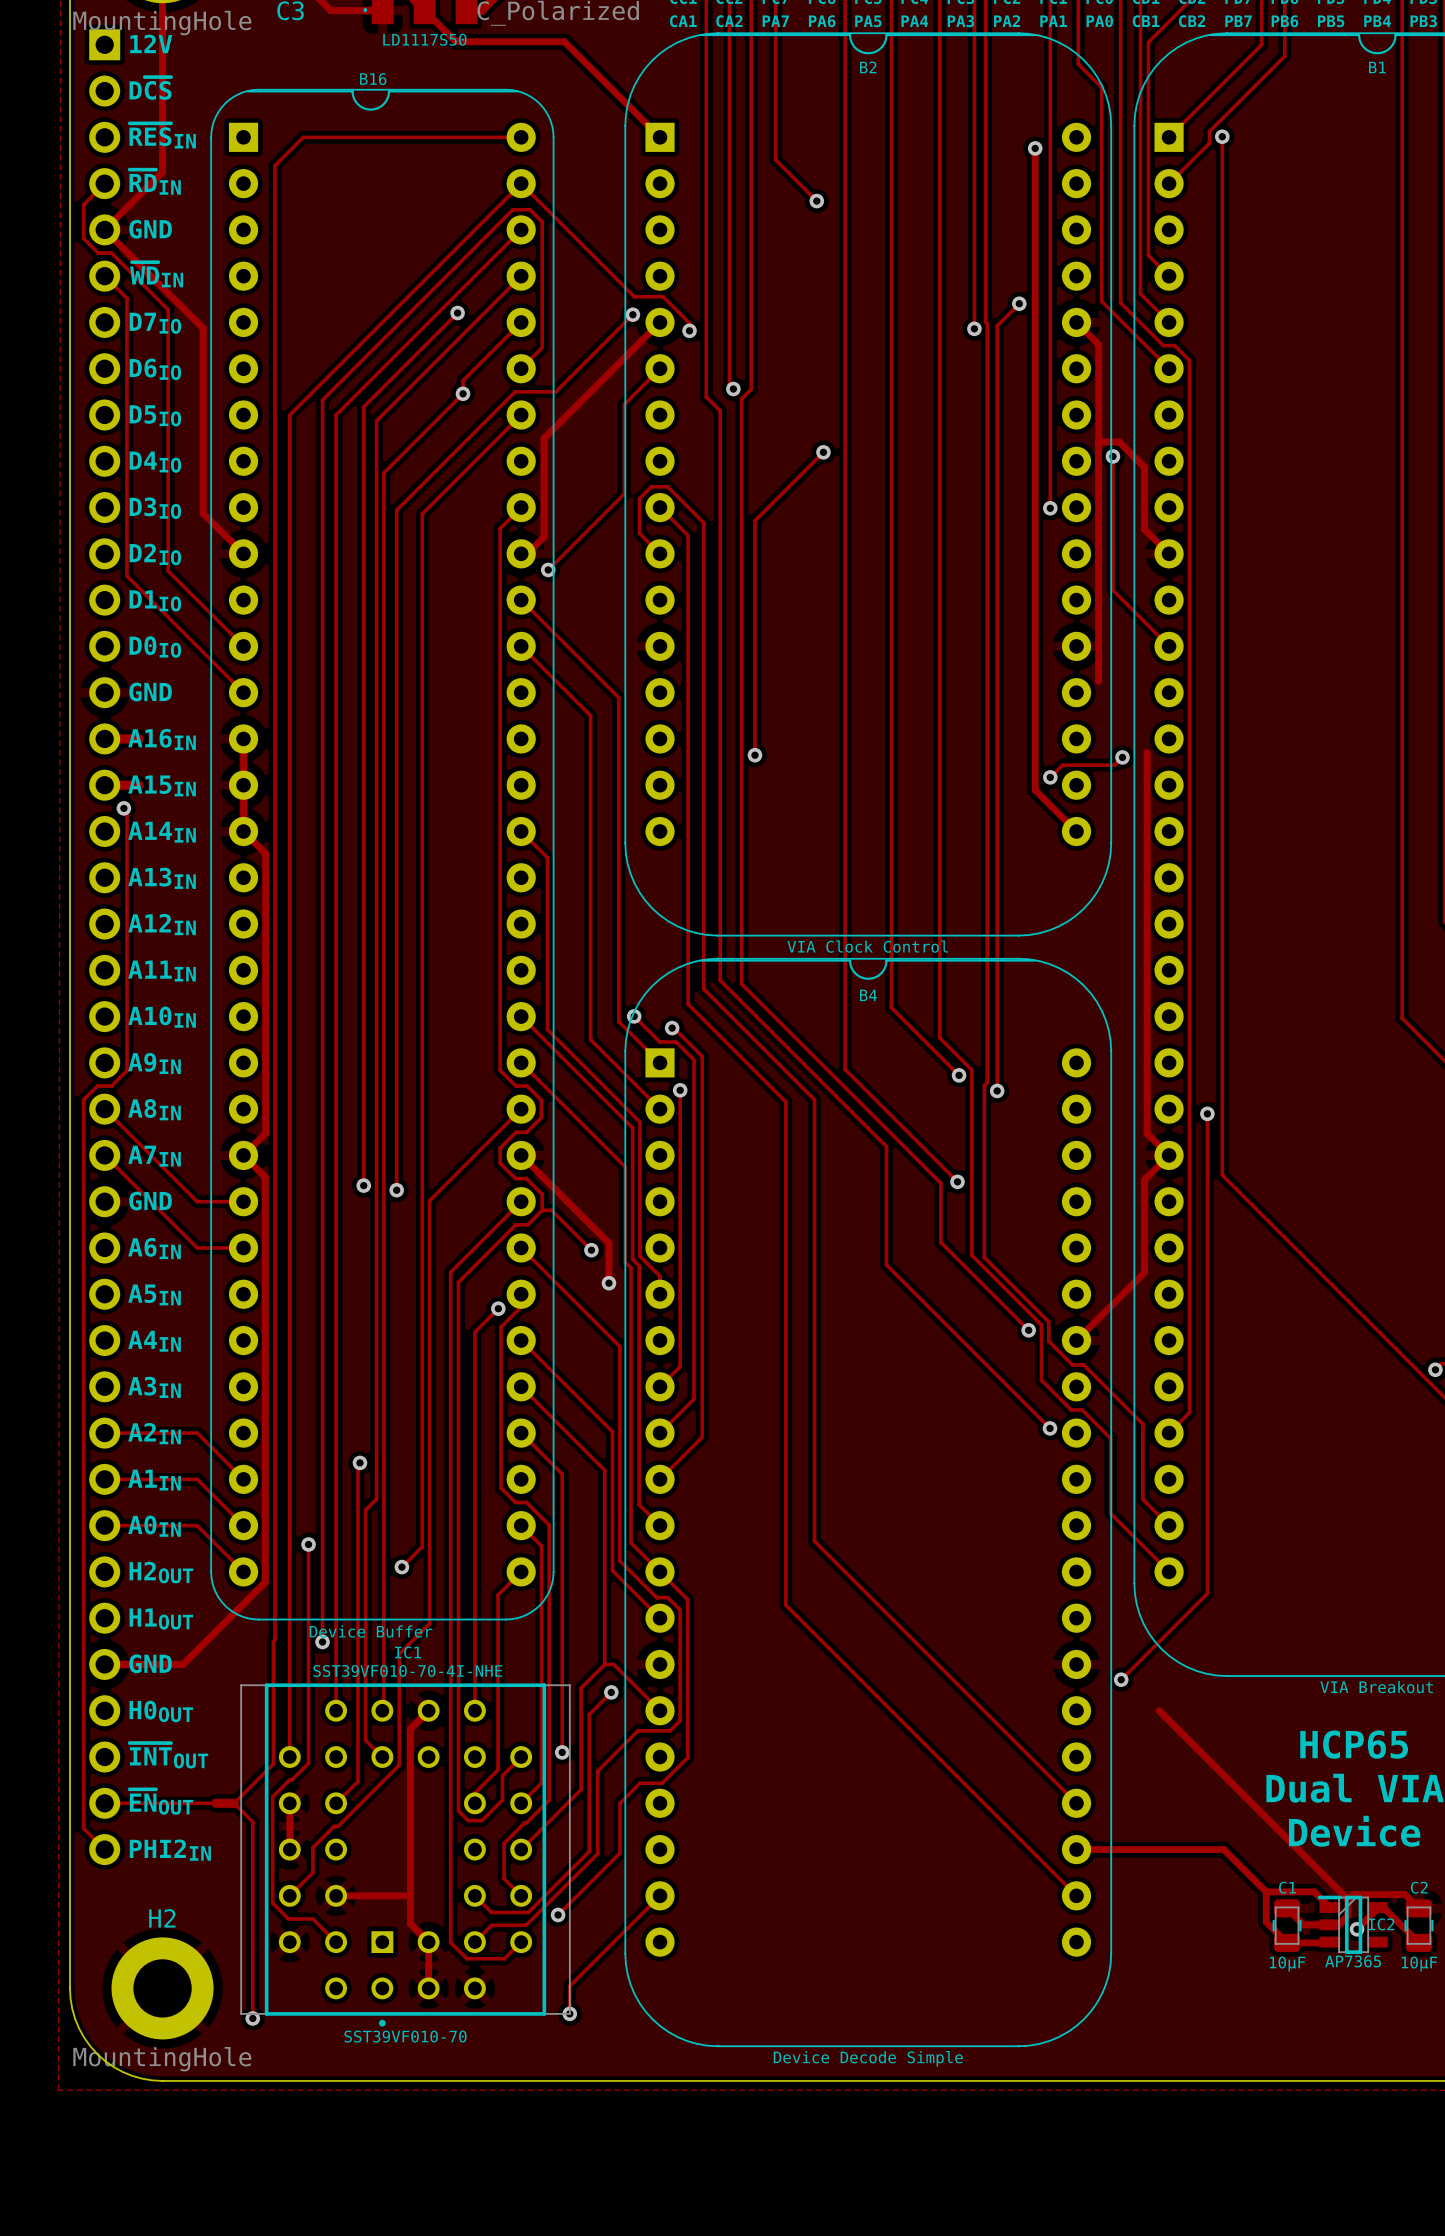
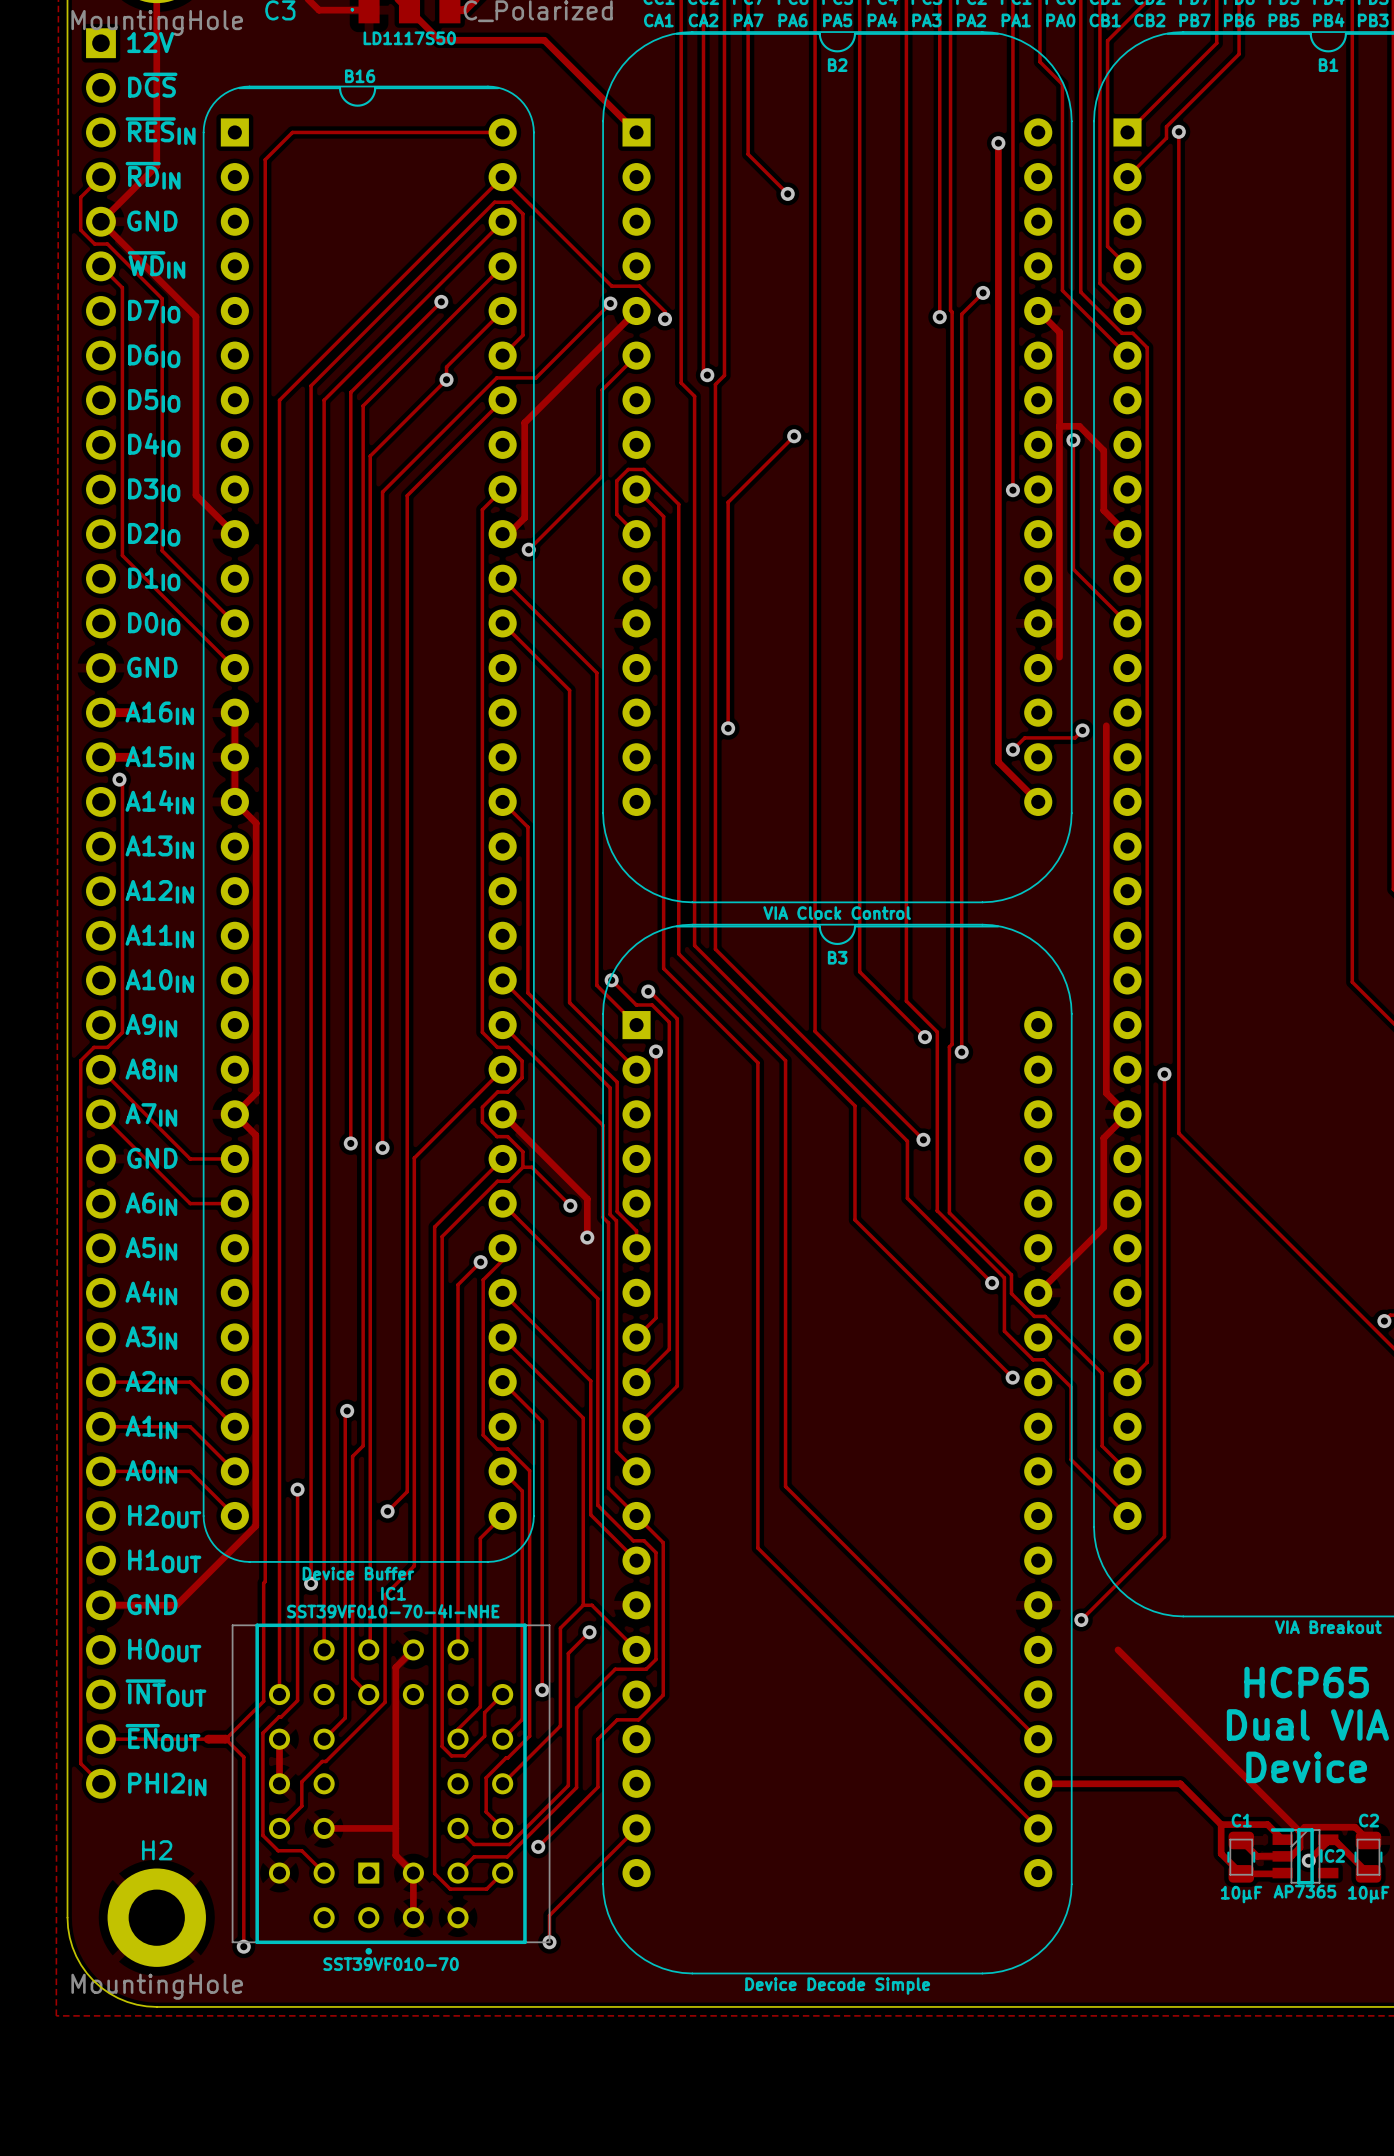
B4 name: B4 (868, 995) -> B3 (837, 957)

